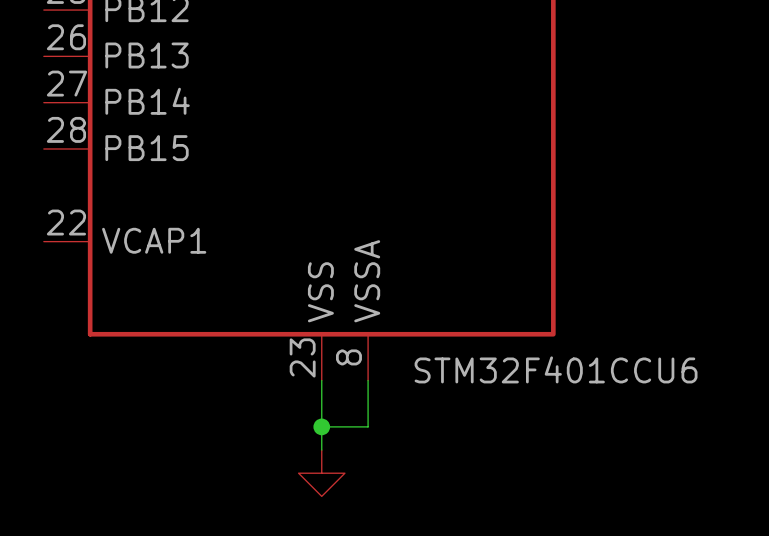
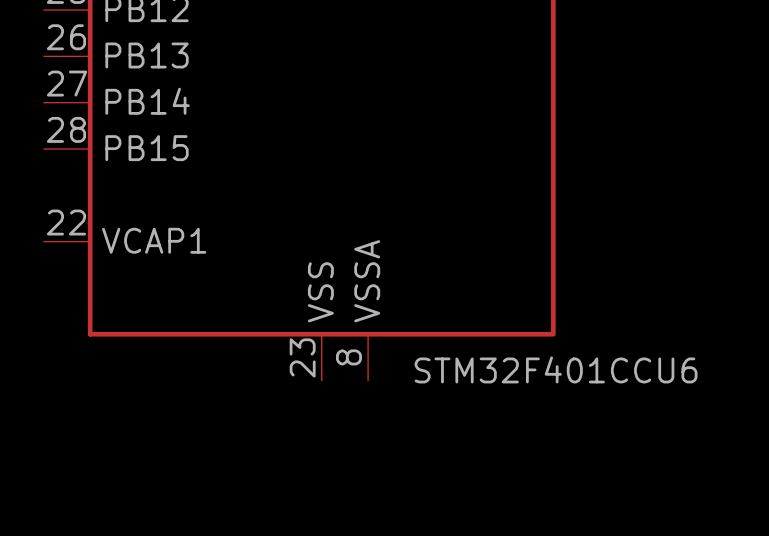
wire: (321, 380) (321, 450) -> none
wire: (368, 380) (368, 426) (321, 426) -> none
junction: (321, 426) -> none
power symbol: (321, 473) -> none

